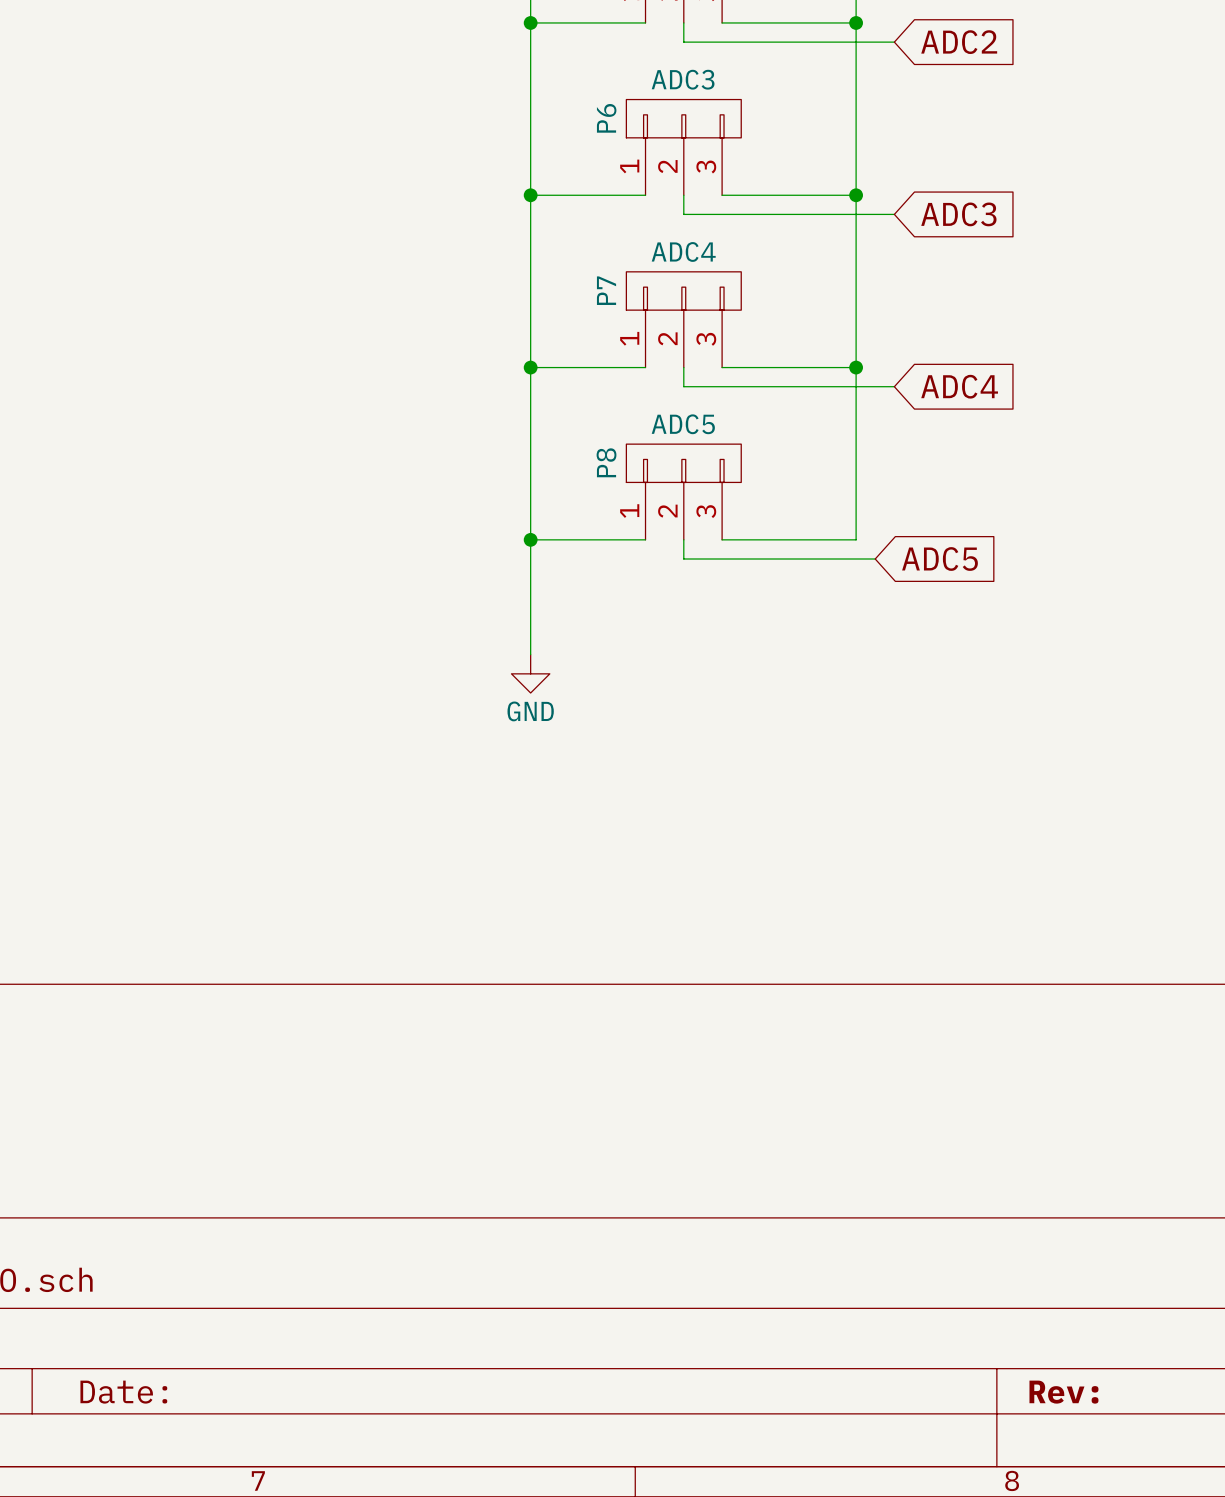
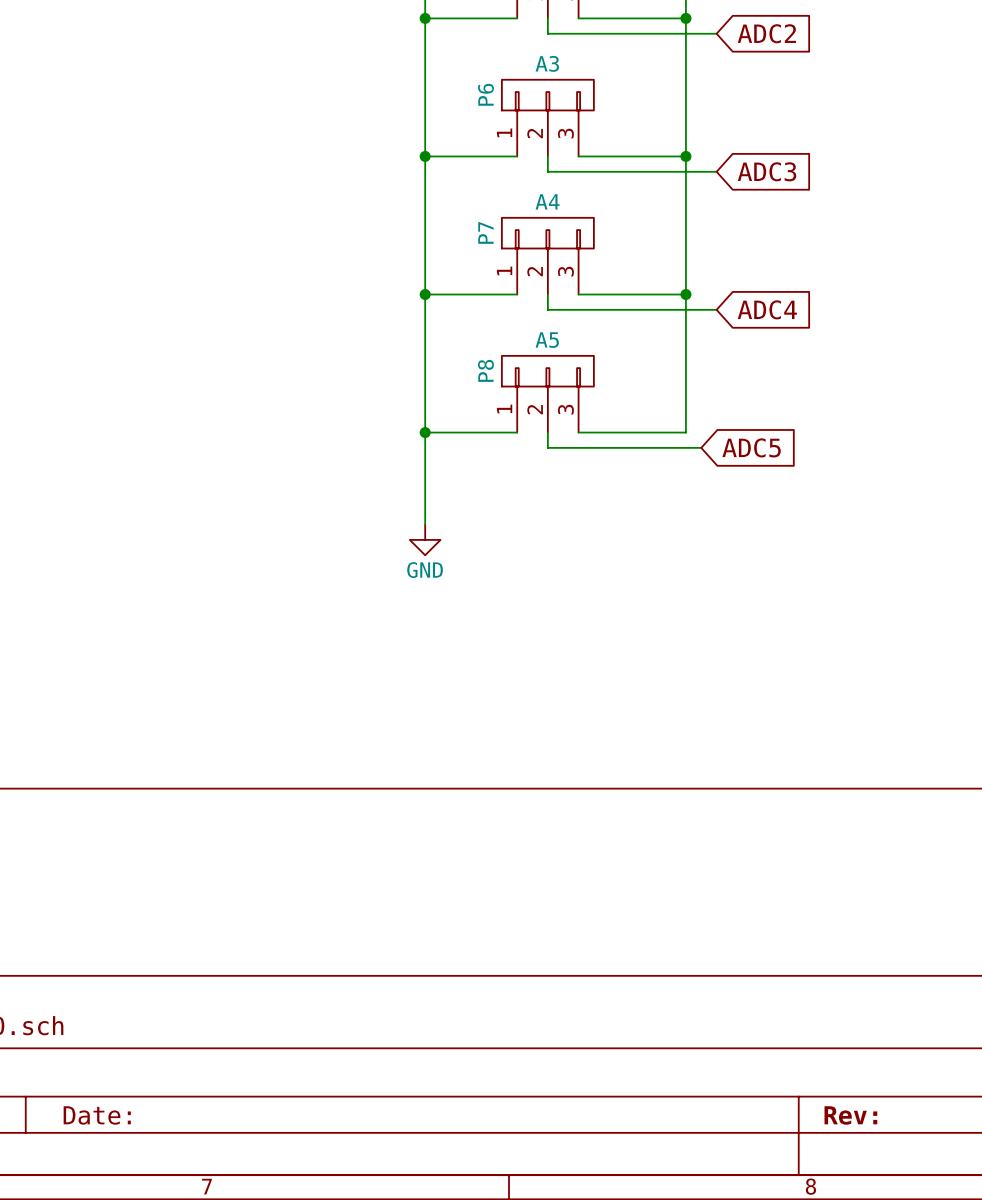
P6 value: ADC3 (683, 79) -> A3 (547, 63)
P7 value: ADC4 (683, 251) -> A4 (547, 201)
P8 value: ADC5 (683, 424) -> A5 (547, 340)

